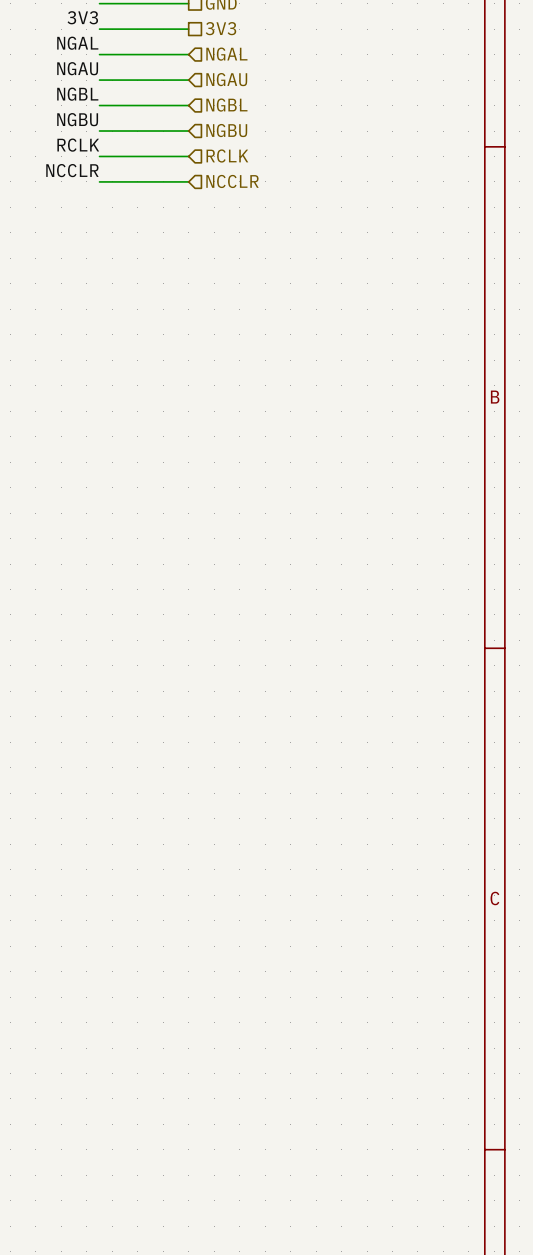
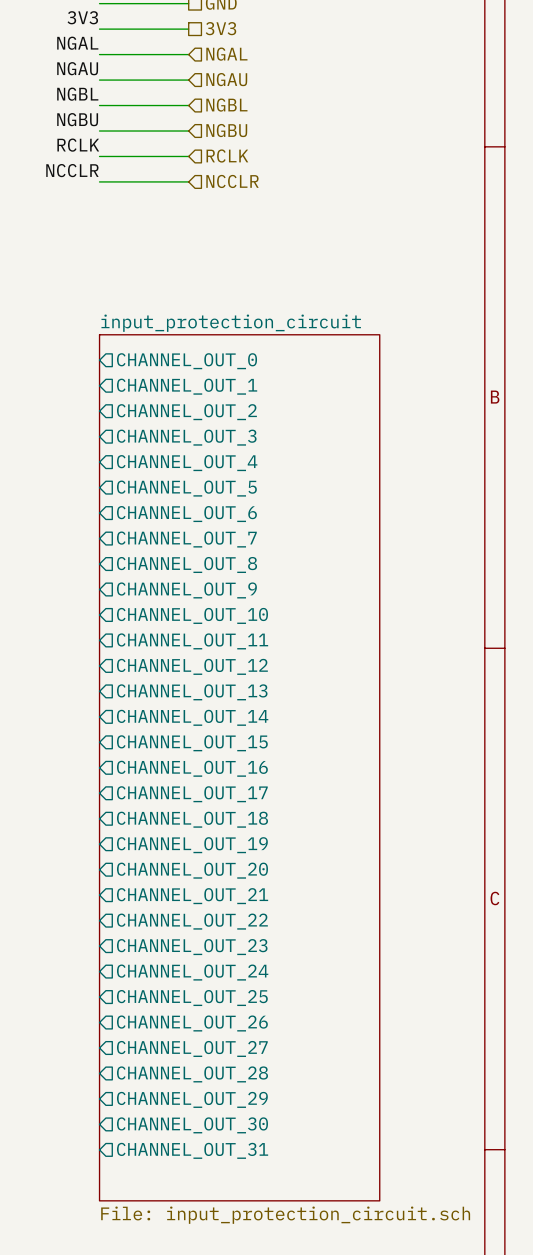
sheet pin: none -> CHANNEL_OUT_0 (187, 361)
sheet pin: none -> CHANNEL_OUT_1 (187, 386)
sheet pin: none -> CHANNEL_OUT_2 (186, 412)
sheet pin: none -> CHANNEL_OUT_3 (186, 437)
sheet pin: none -> CHANNEL_OUT_4 (187, 463)
sheet pin: none -> CHANNEL_OUT_5 (186, 488)
sheet pin: none -> CHANNEL_OUT_6 (186, 514)
sheet pin: none -> CHANNEL_OUT_7 (186, 539)
sheet pin: none -> CHANNEL_OUT_8 (187, 564)
sheet pin: none -> CHANNEL_OUT_9 (186, 590)
sheet pin: none -> CHANNEL_OUT_10 (192, 615)
sheet pin: none -> CHANNEL_OUT_11 (192, 641)
sheet pin: none -> CHANNEL_OUT_12 (192, 666)
sheet pin: none -> CHANNEL_OUT_13 (192, 692)
sheet pin: none -> CHANNEL_OUT_14 (192, 717)
sheet pin: none -> CHANNEL_OUT_15 (192, 743)
sheet input_protection_circuit: none -> File: input_protection_circuit.sch (239, 767)
sheet pin: none -> CHANNEL_OUT_16 (192, 768)
sheet pin: none -> CHANNEL_OUT_17 (192, 794)
sheet pin: none -> CHANNEL_OUT_18 (192, 819)
sheet pin: none -> CHANNEL_OUT_19 (192, 845)
sheet pin: none -> CHANNEL_OUT_20 (192, 870)
sheet pin: none -> CHANNEL_OUT_21 (192, 896)
sheet pin: none -> CHANNEL_OUT_22 (192, 921)
sheet pin: none -> CHANNEL_OUT_23 (192, 947)
sheet pin: none -> CHANNEL_OUT_24 (192, 972)
sheet pin: none -> CHANNEL_OUT_25 (192, 998)
sheet pin: none -> CHANNEL_OUT_26 (192, 1023)
sheet pin: none -> CHANNEL_OUT_27 (192, 1048)
sheet pin: none -> CHANNEL_OUT_28 (192, 1074)
sheet pin: none -> CHANNEL_OUT_29 (192, 1099)
sheet pin: none -> CHANNEL_OUT_30 (192, 1125)
sheet pin: none -> CHANNEL_OUT_31 (192, 1150)

